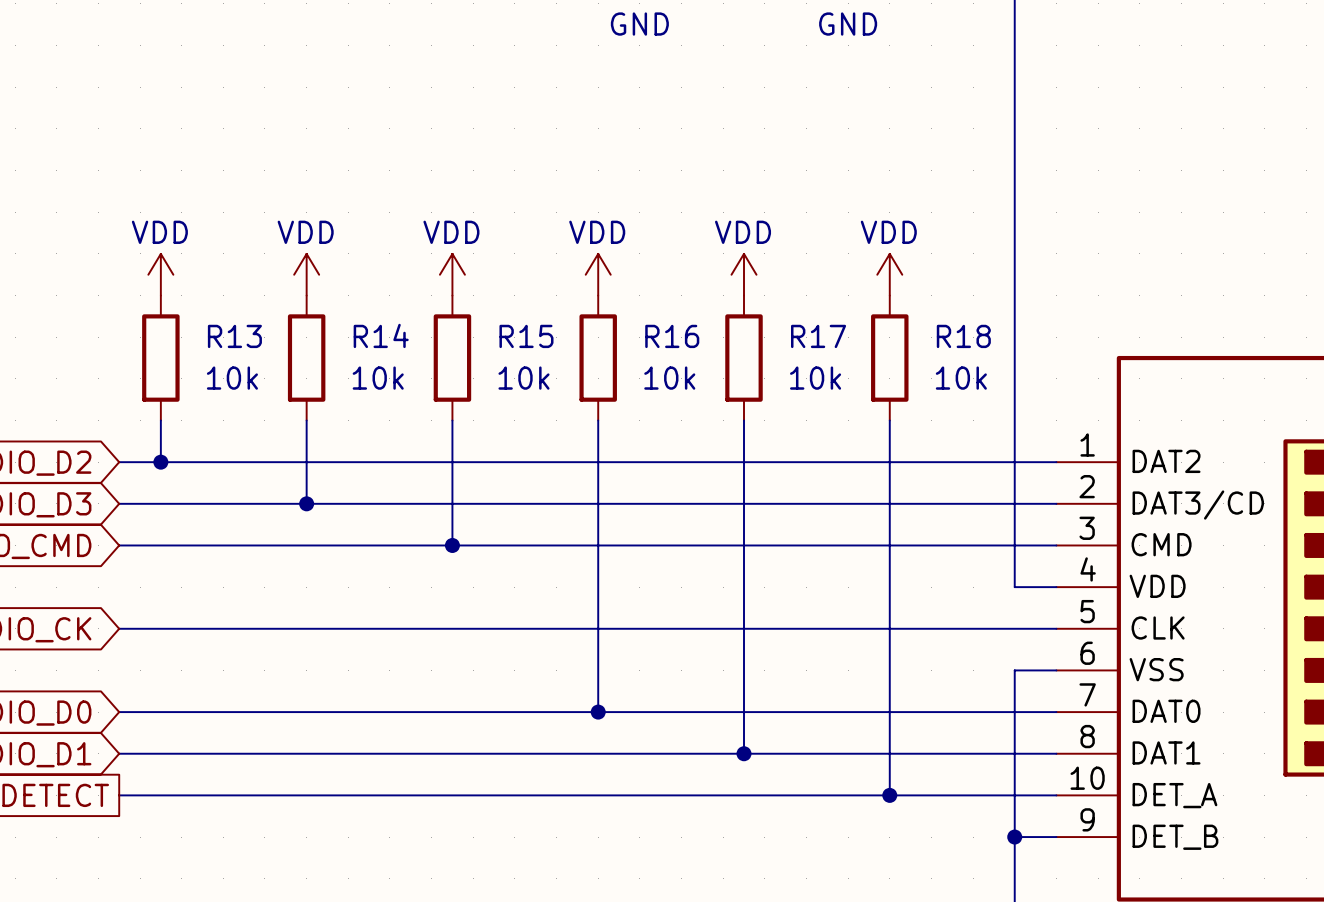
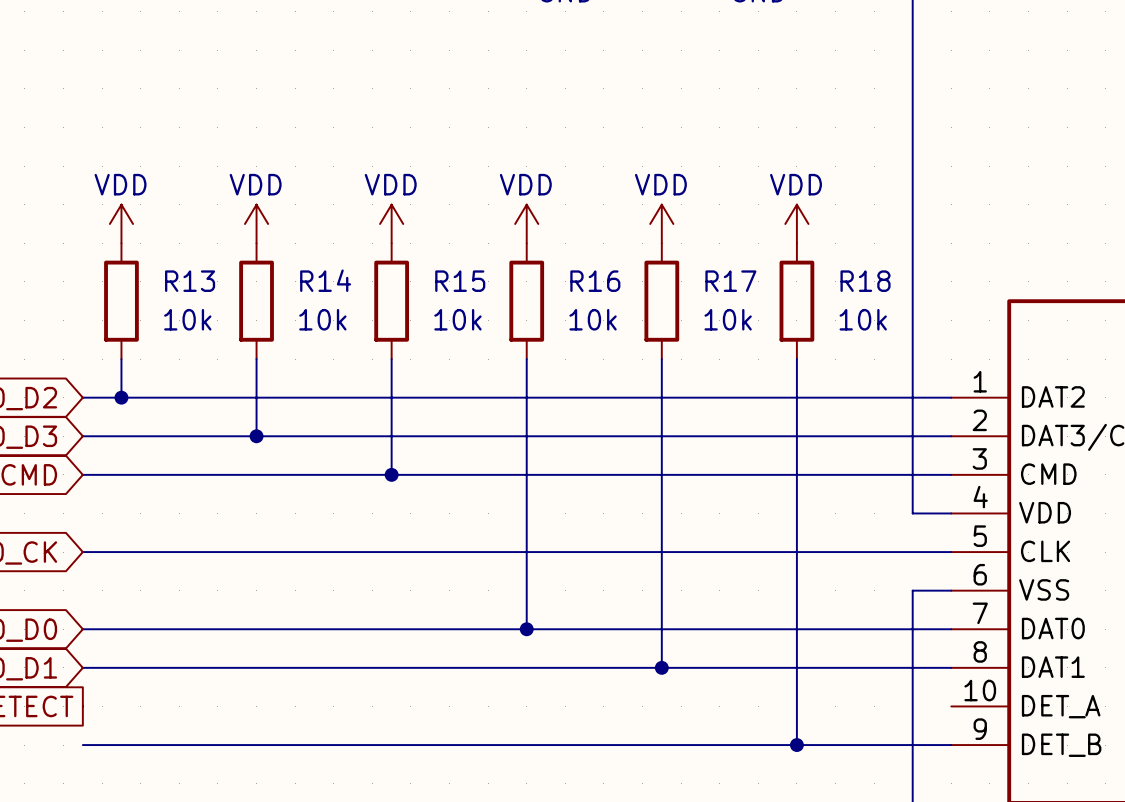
wire: (119, 795) (1056, 795) -> none
wire: none -> (796, 706) (796, 745)
junction position: (889, 795) -> (796, 745)
wire: none -> (82, 745) (912, 745)
junction: (1014, 837) -> none

